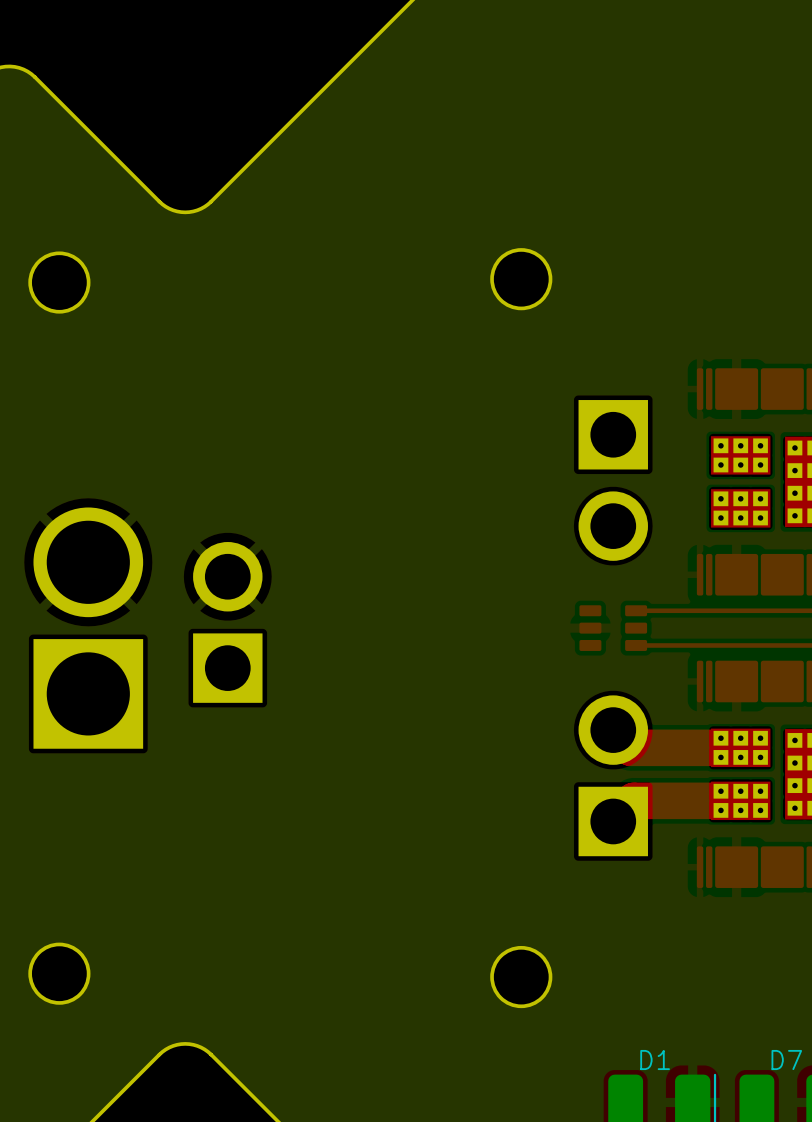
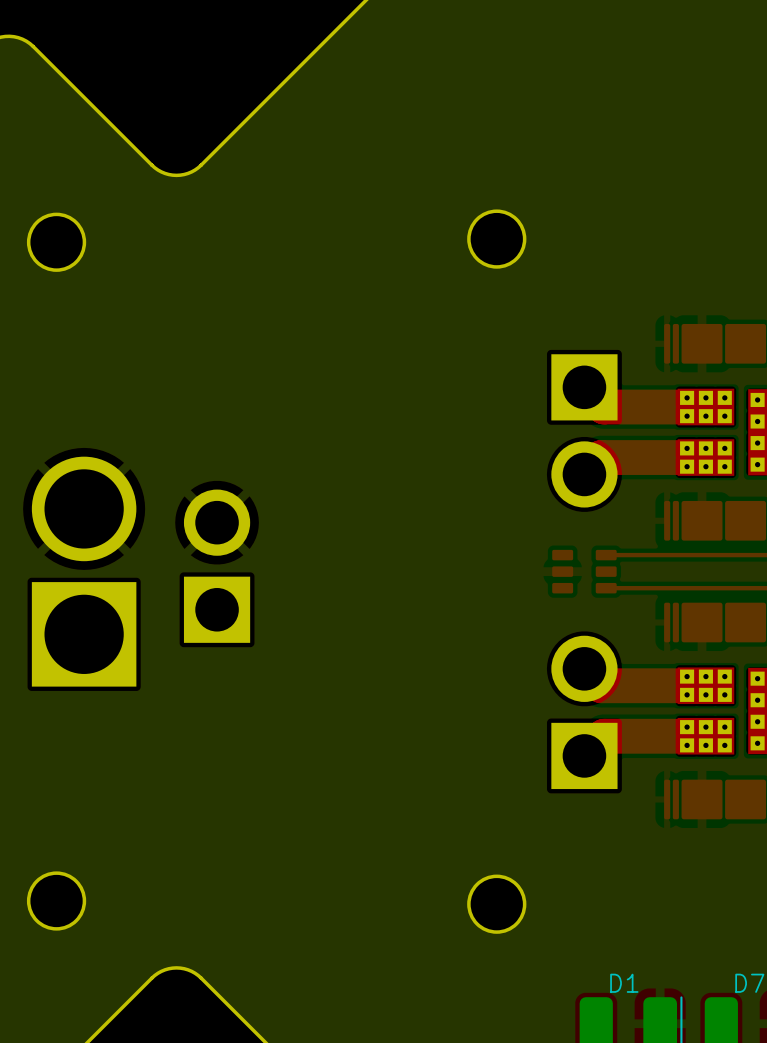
top track: none -> (584, 387) (604, 407) (705, 407)
top track: none -> (705, 457) (601, 457) (584, 474)

